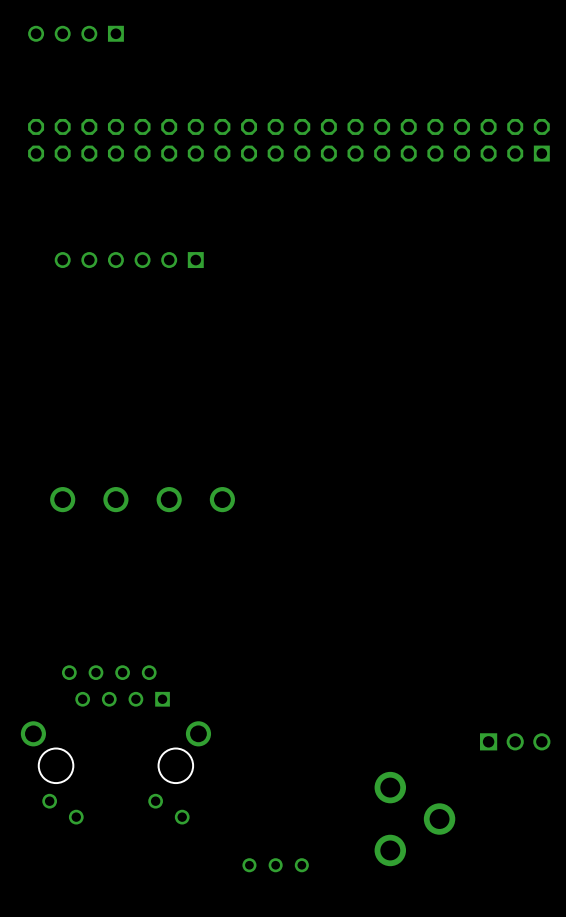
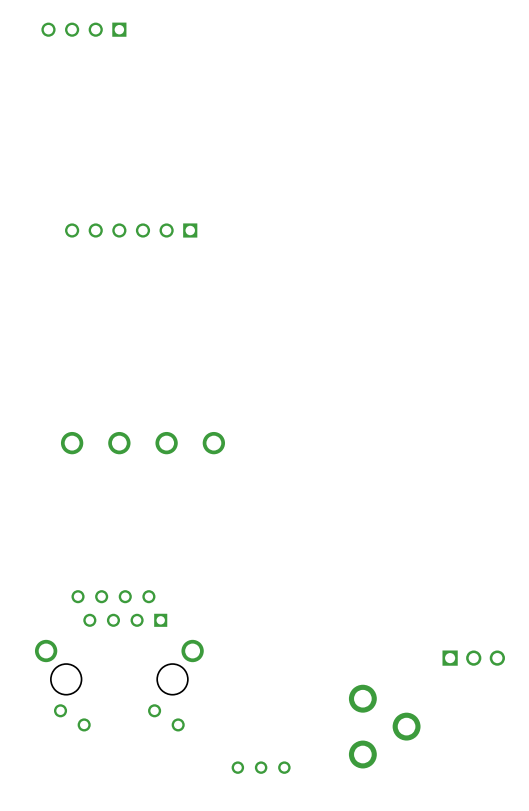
part: (288, 140) -> none

